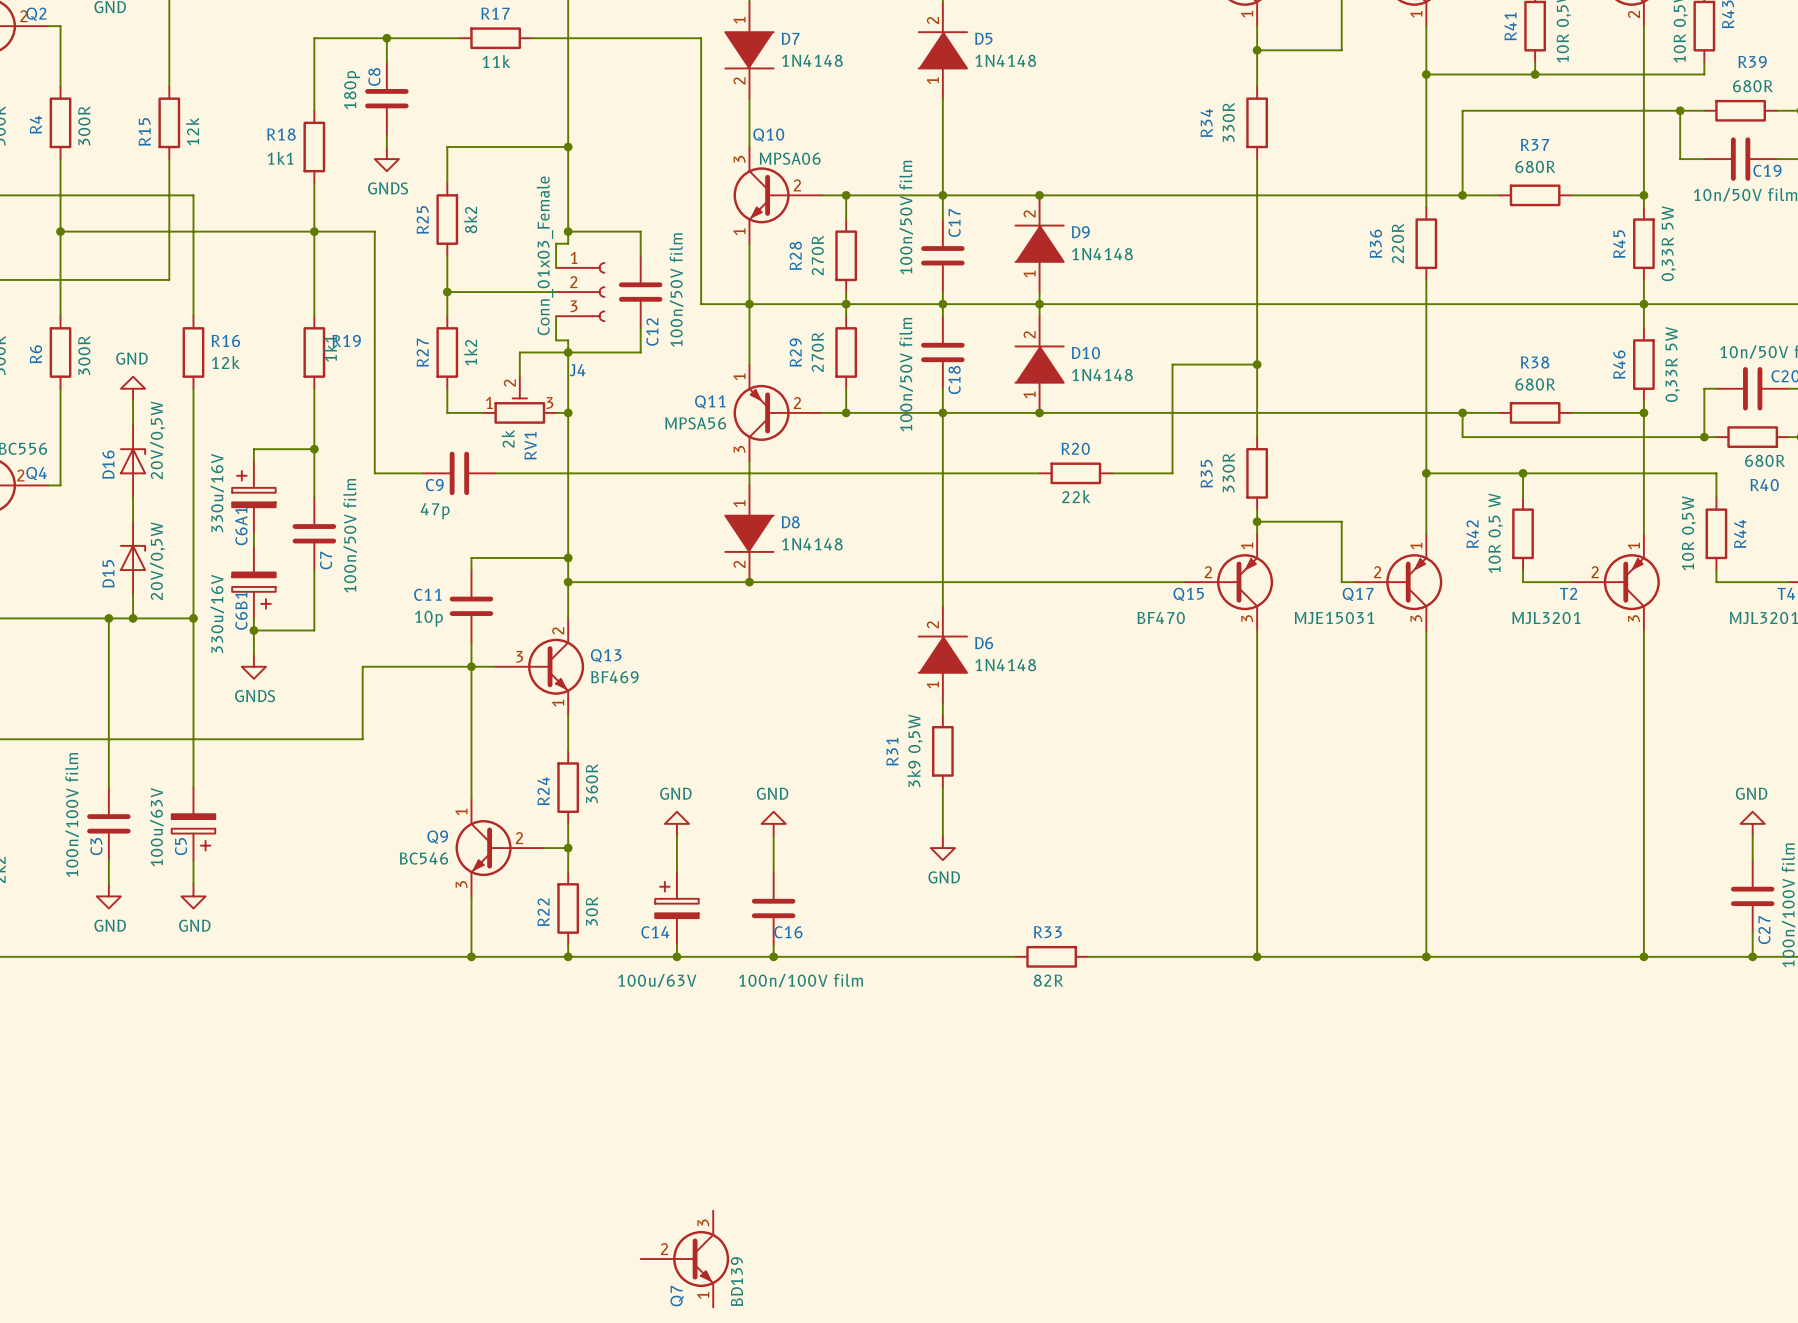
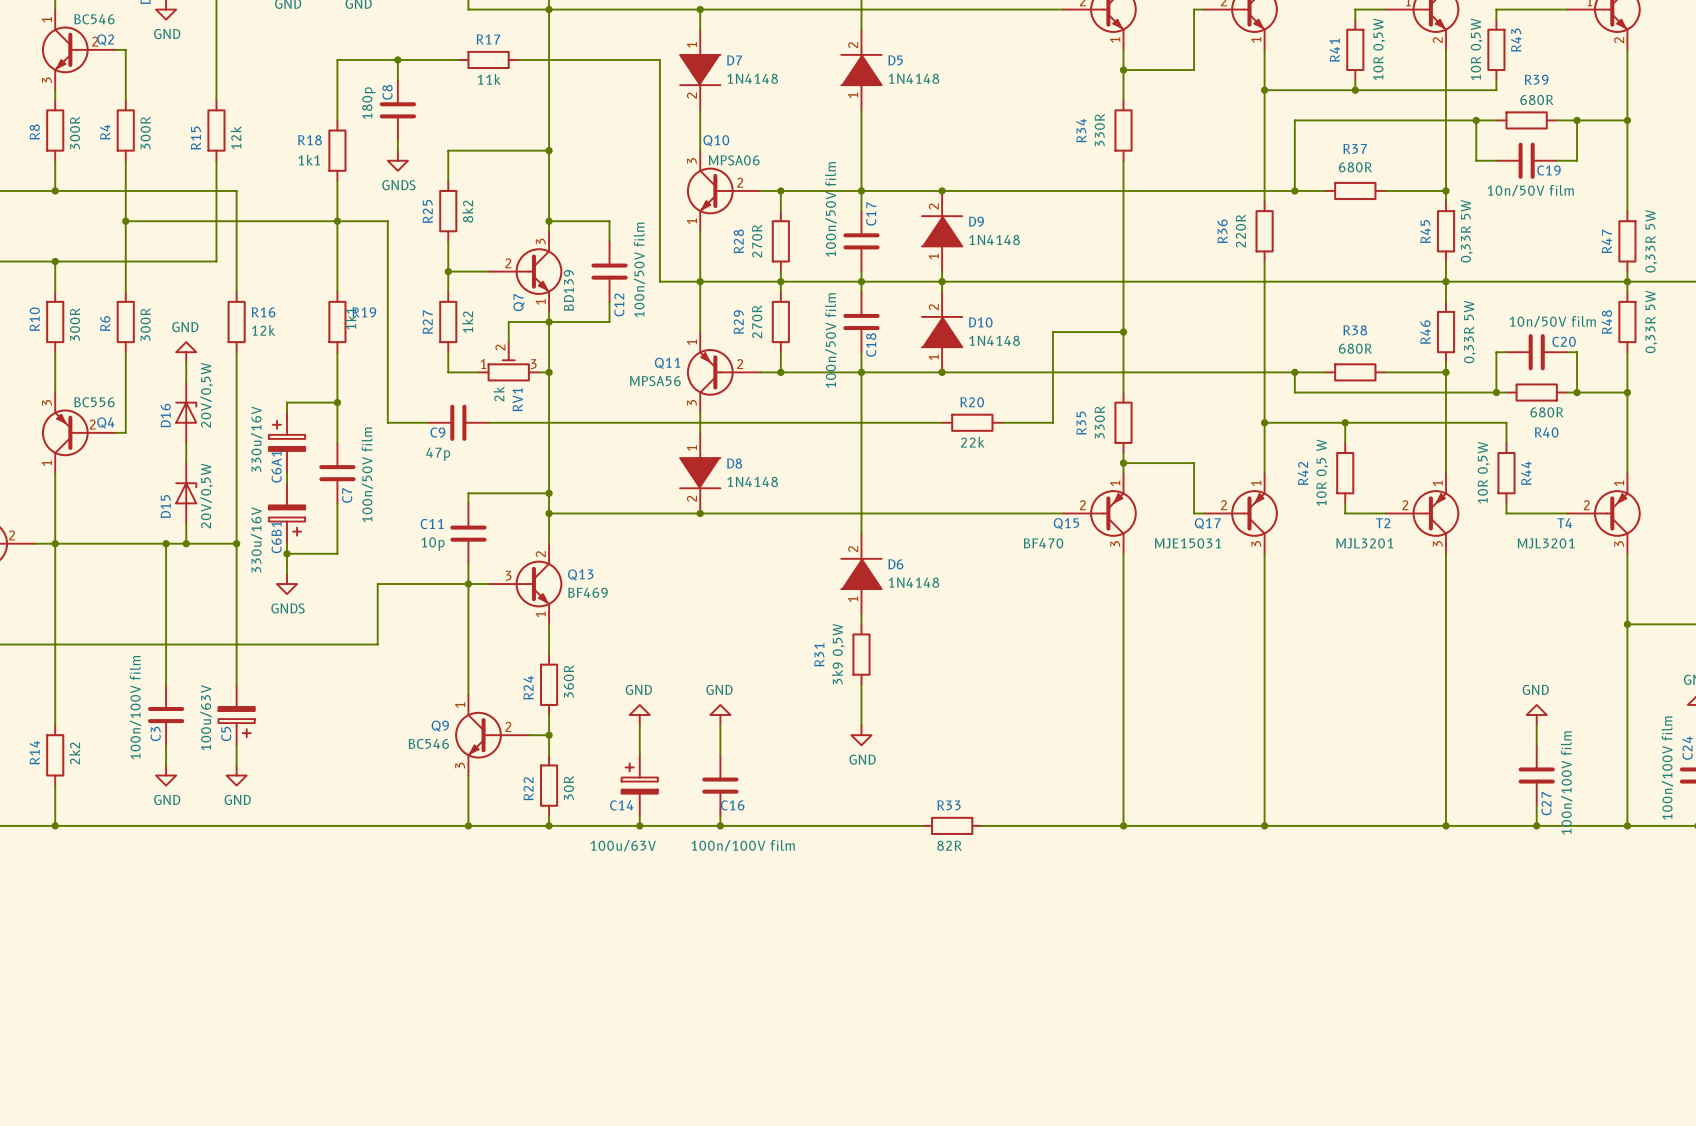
wire: (568, 243) (556, 243) (556, 267) -> none
J4: Conn_01x03_Female (580, 292) -> none
wire: (556, 316) (556, 340) (568, 340) -> none
Q7 position: (684, 1259) -> (525, 271)

